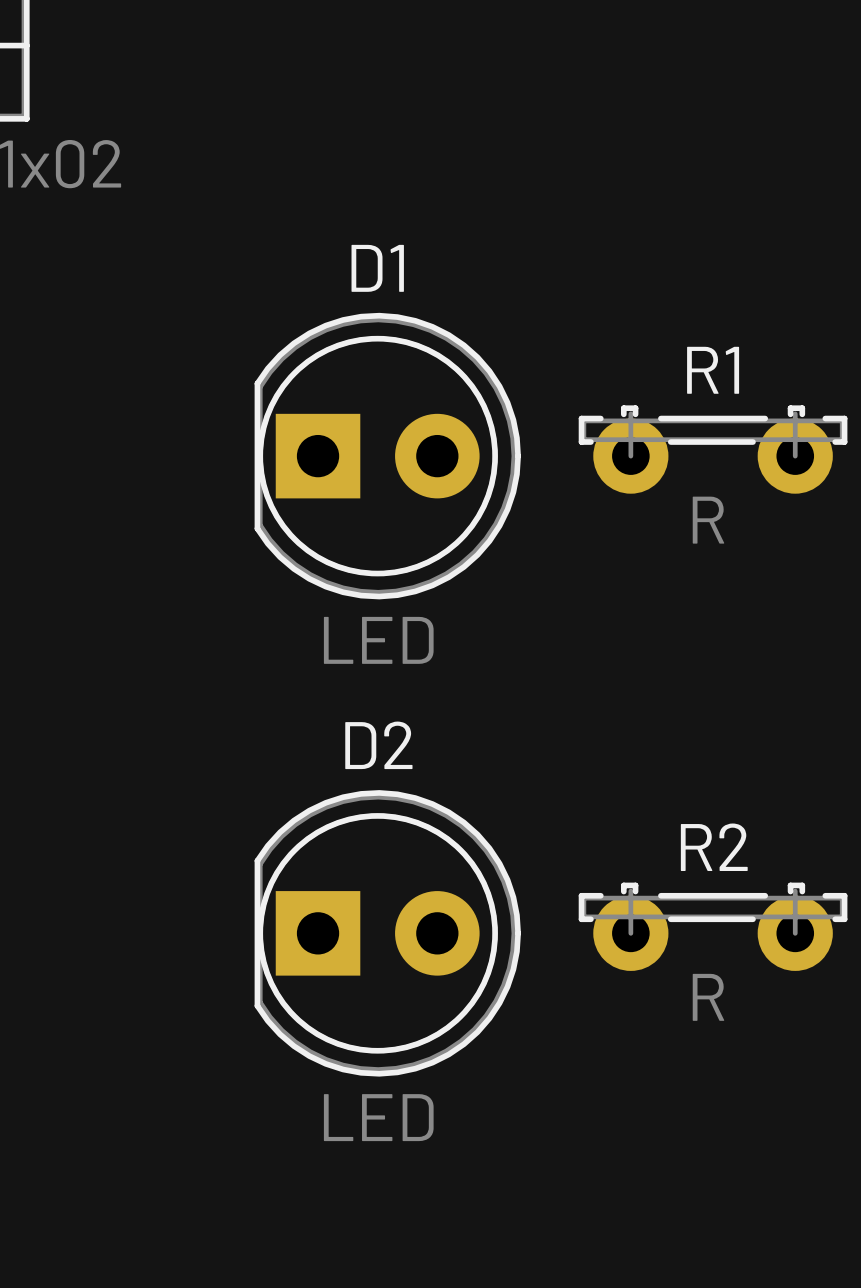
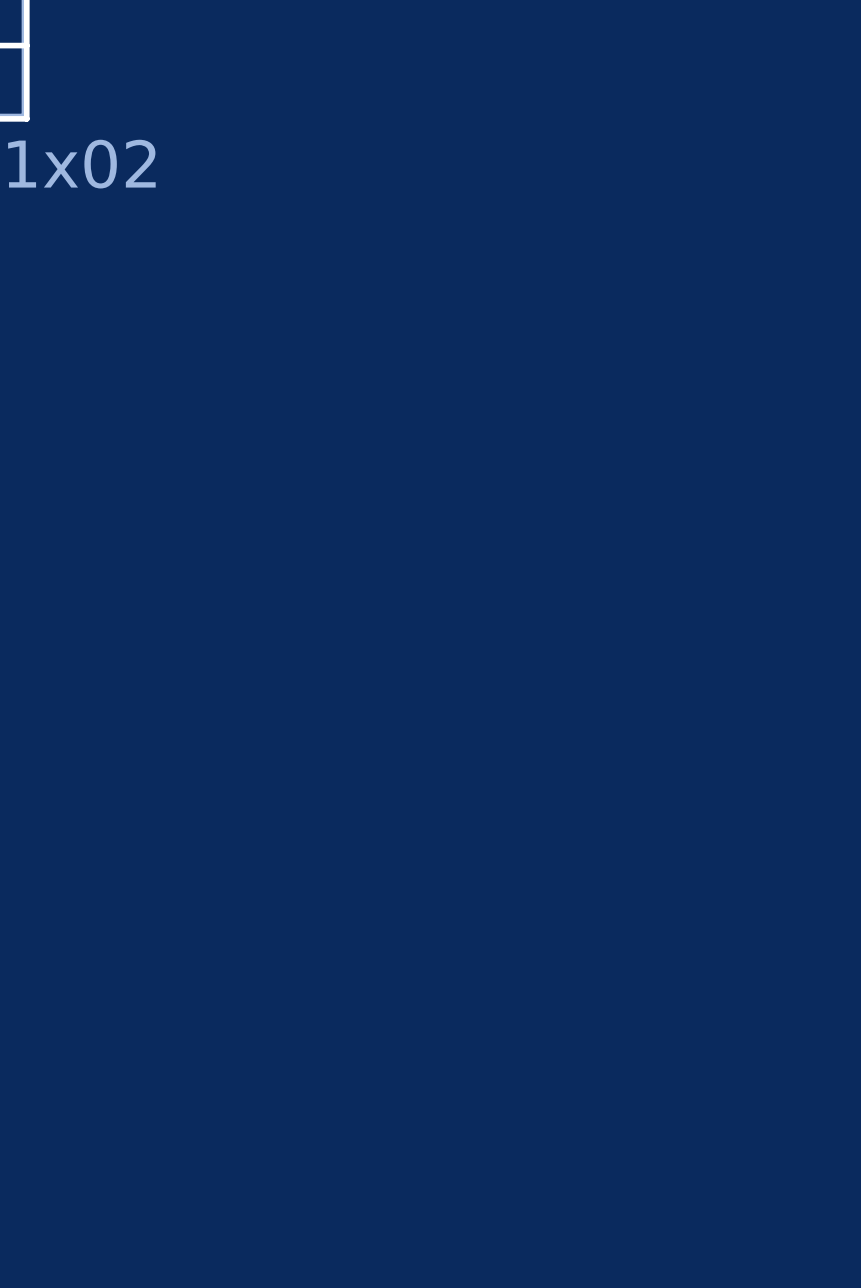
R1: R (713, 449) -> none
D1: LED (387, 456) -> none
R2: R (713, 926) -> none
D2: LED (387, 933) -> none

